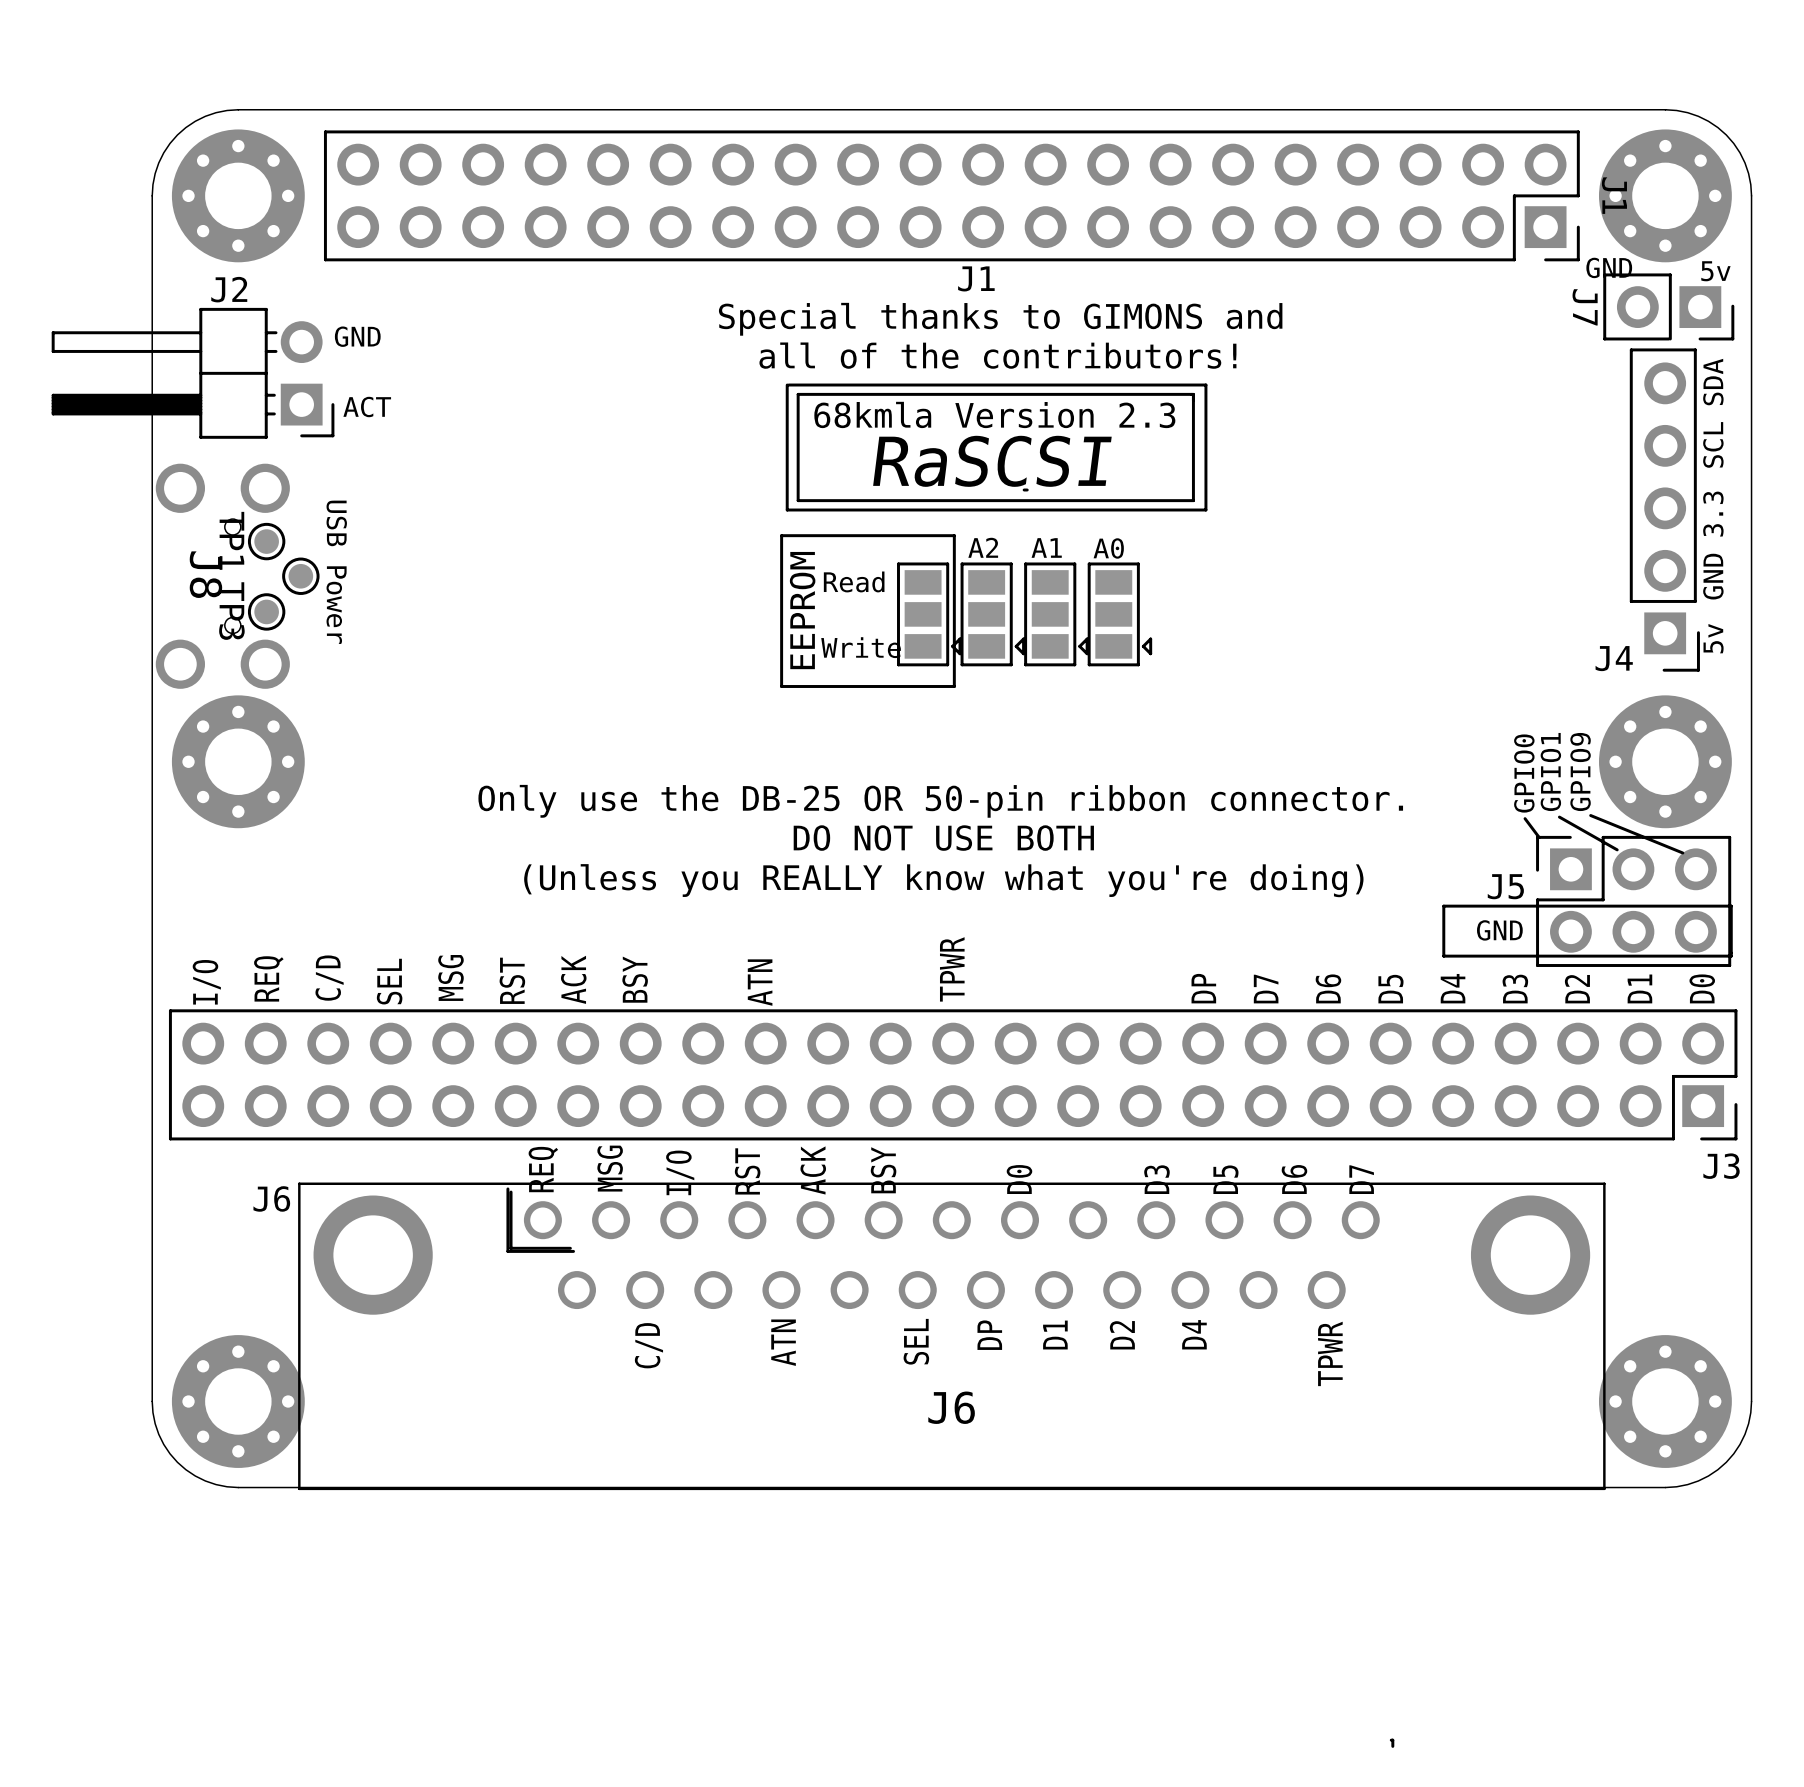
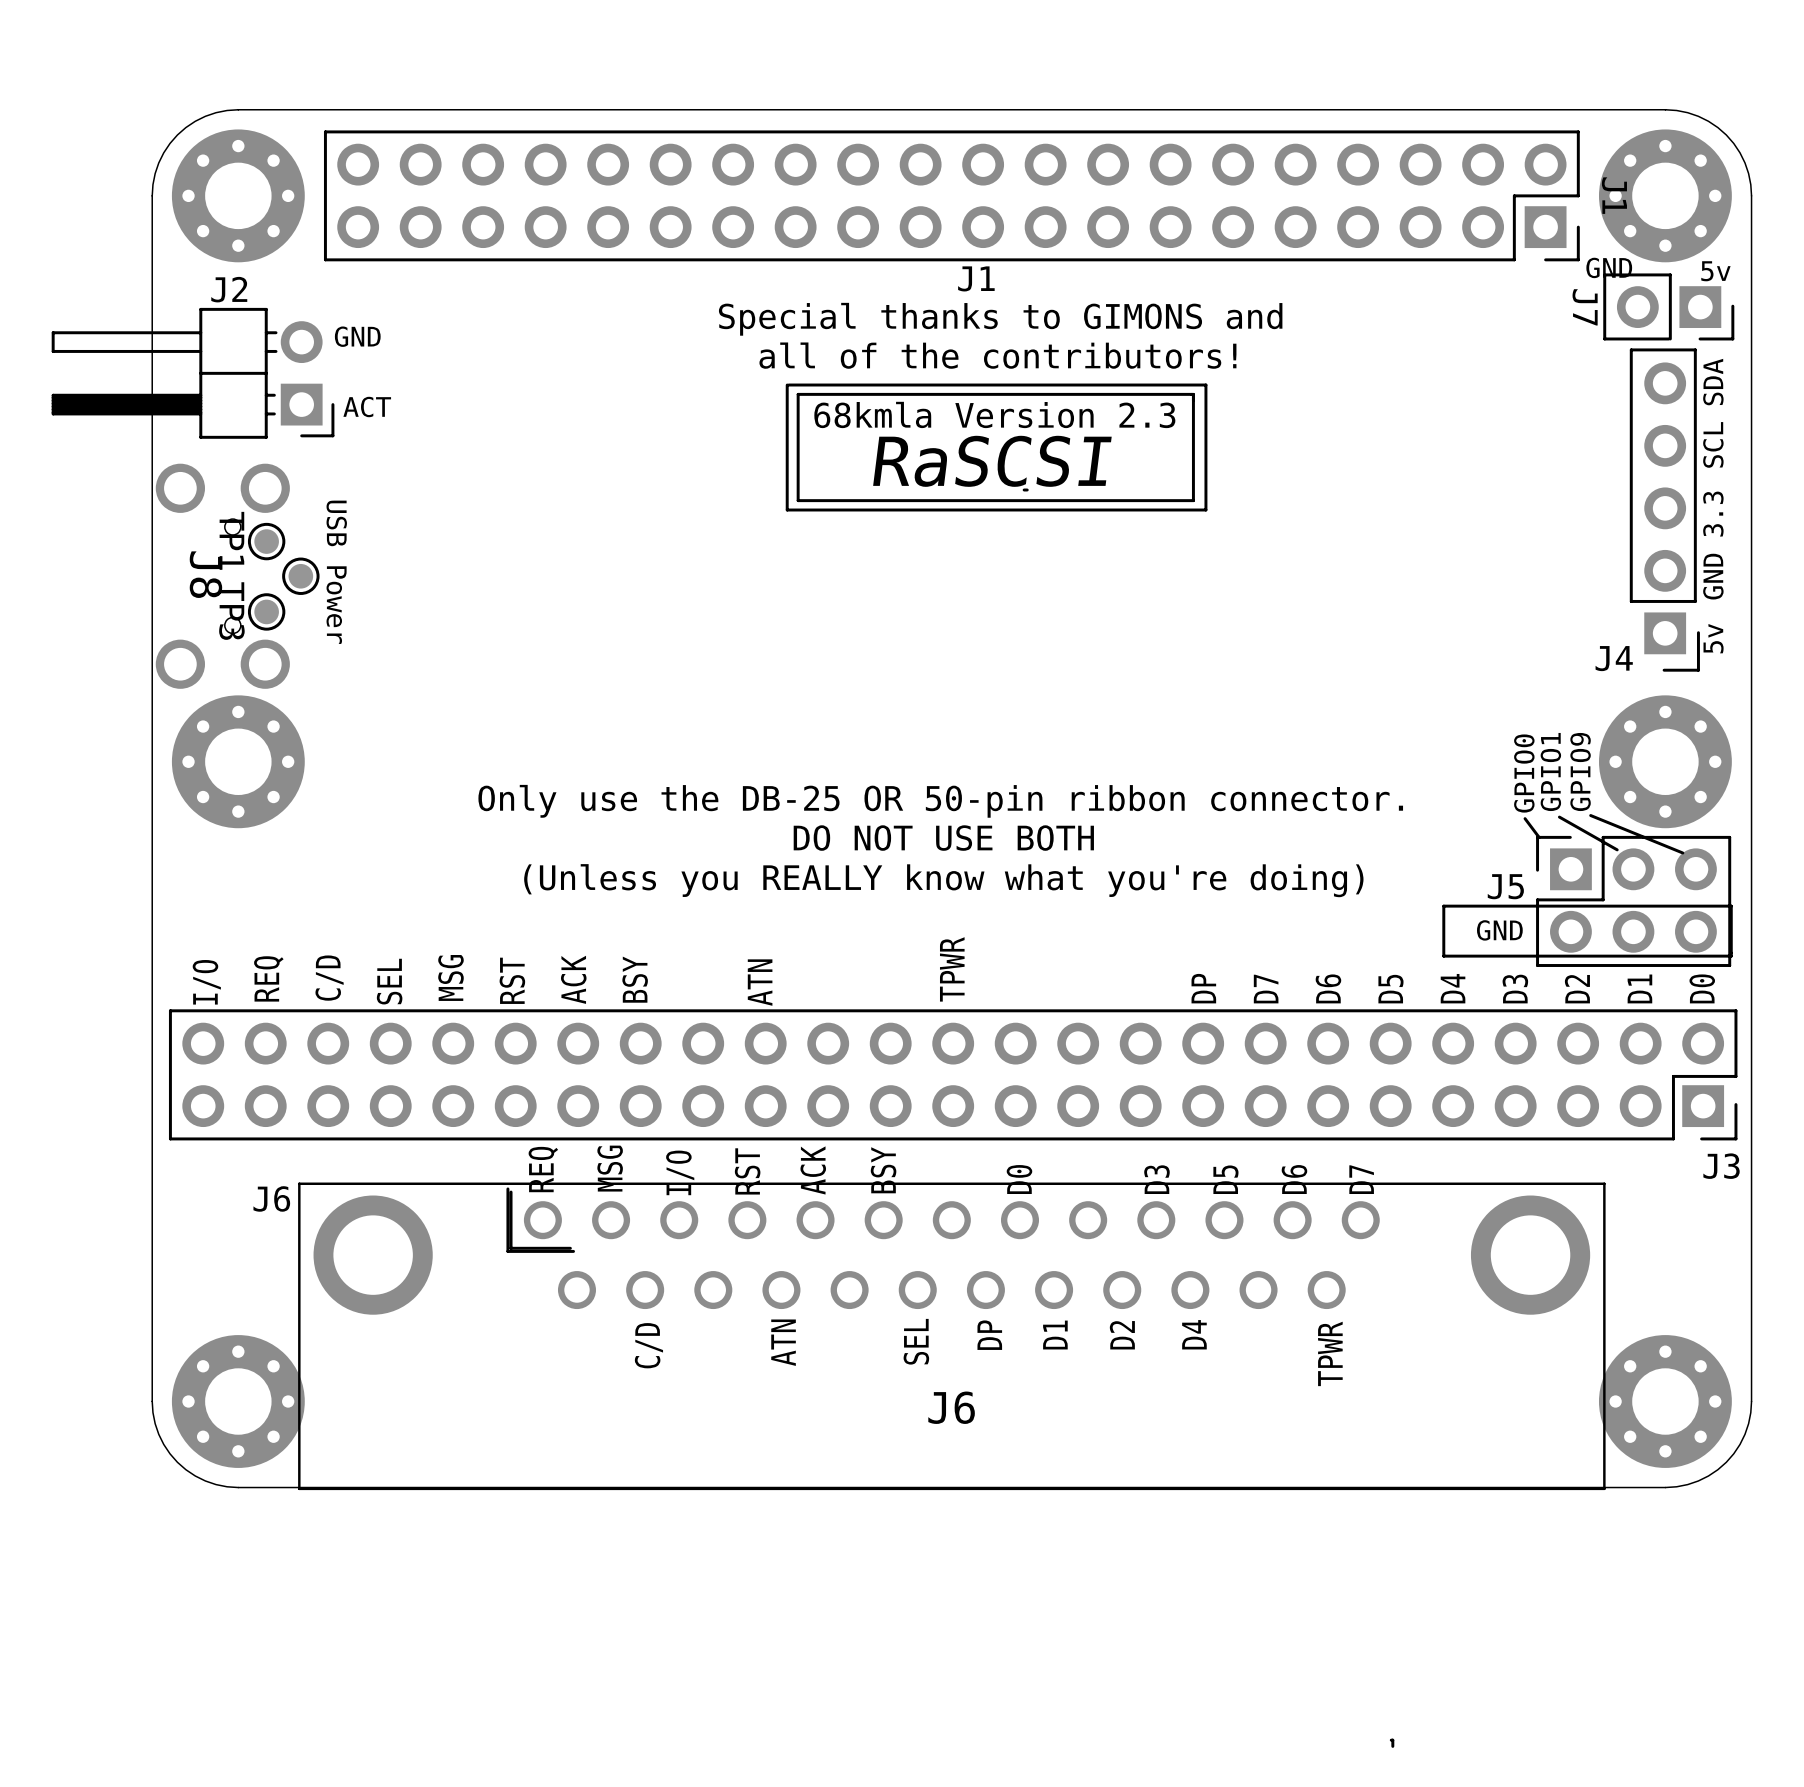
line: (954, 535) (781, 535) (781, 686) (954, 686) (954, 535) -> none
text: A2 (983, 547) -> none
text: A1 (1046, 547) -> none
text: A0 (1108, 548) -> none
text: Read (854, 581) -> none
text: EEPROM (802, 610) -> none
part: (929, 614) -> none
part: (992, 614) -> none
part: (1056, 614) -> none
part: (1119, 614) -> none
text: Write (861, 647) -> none

